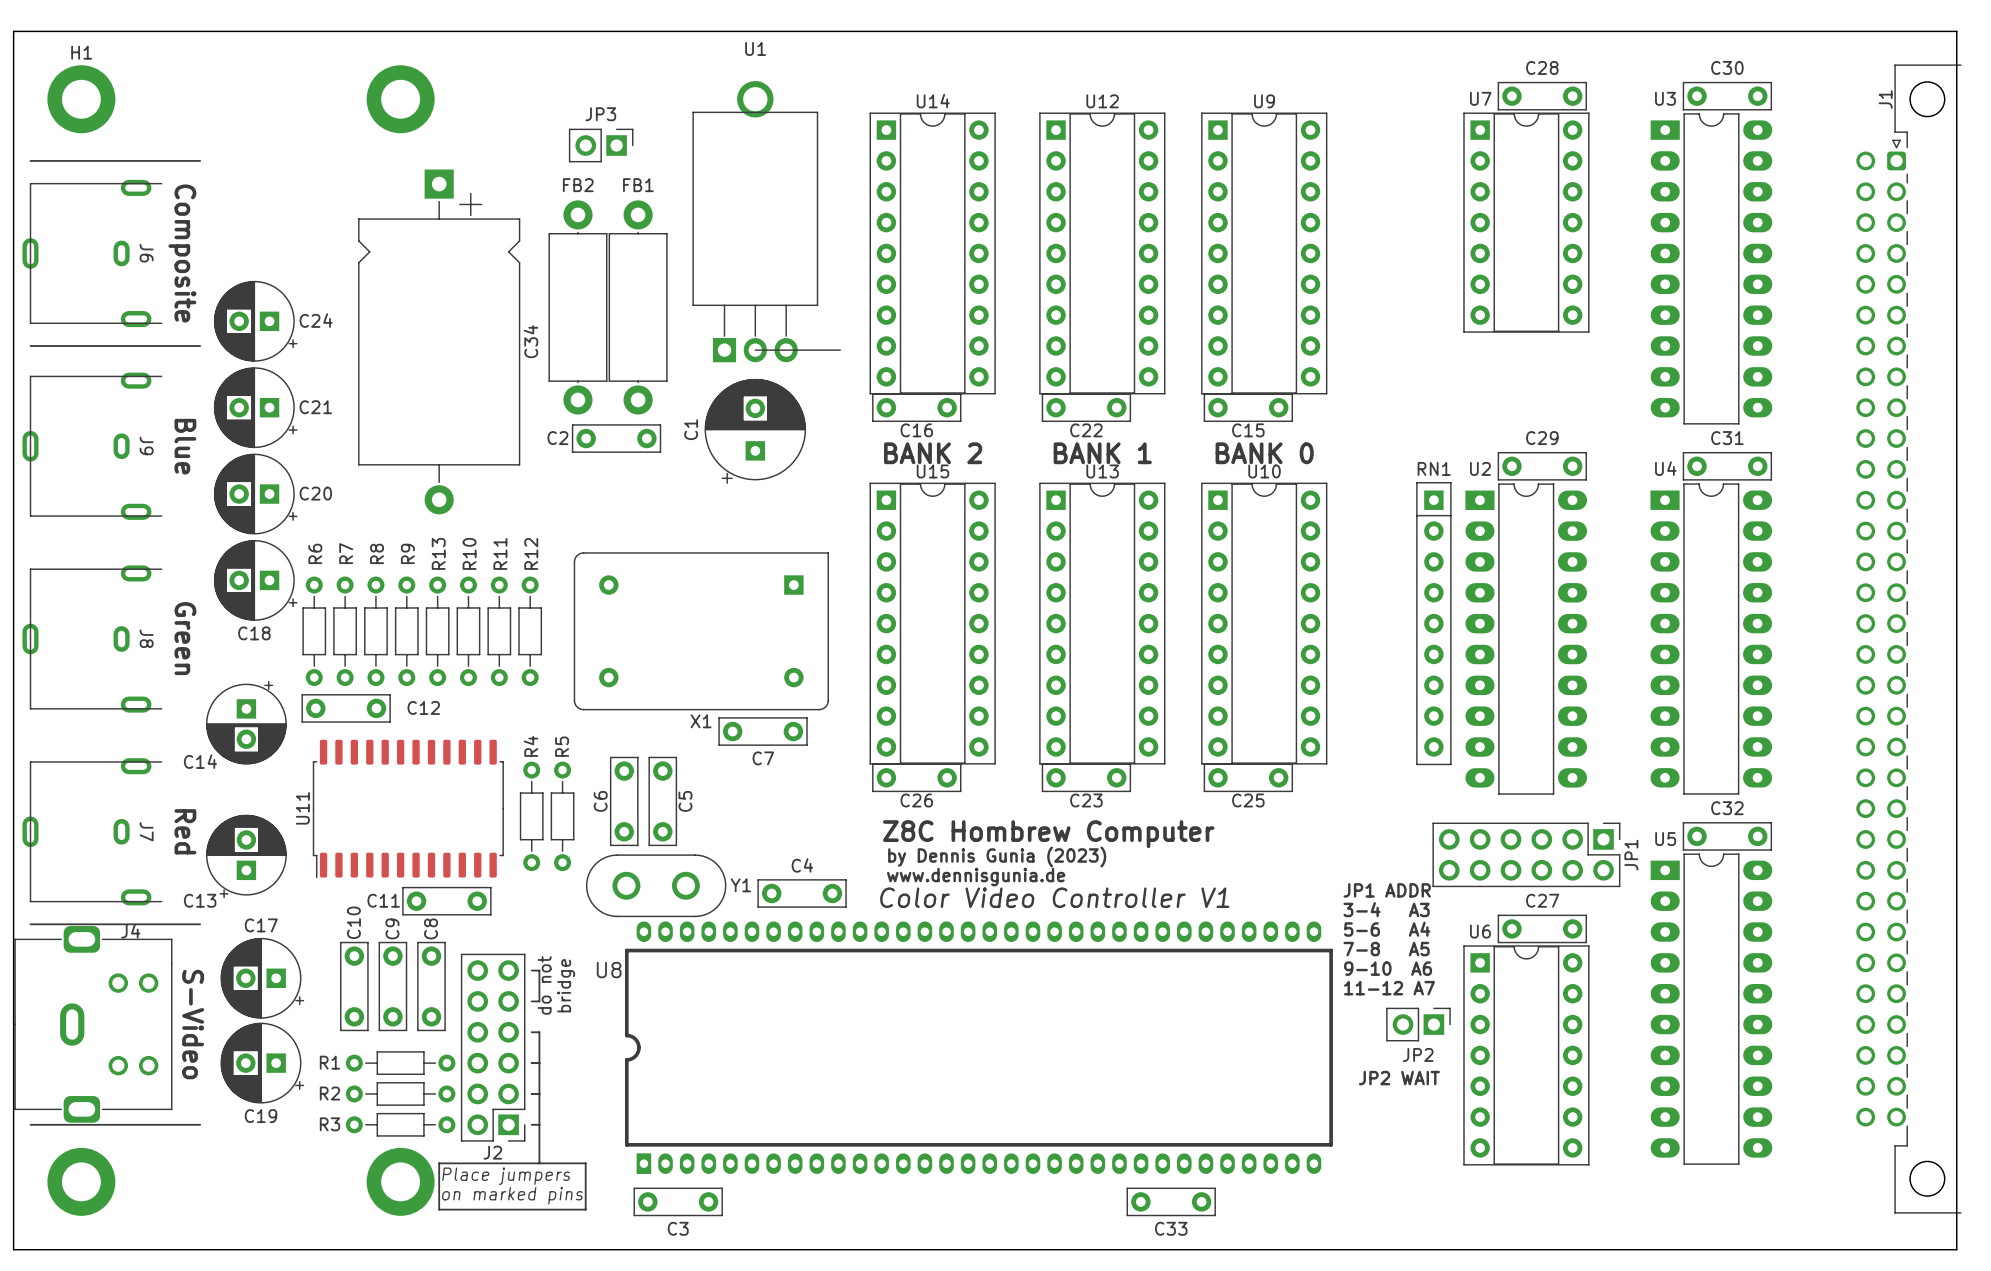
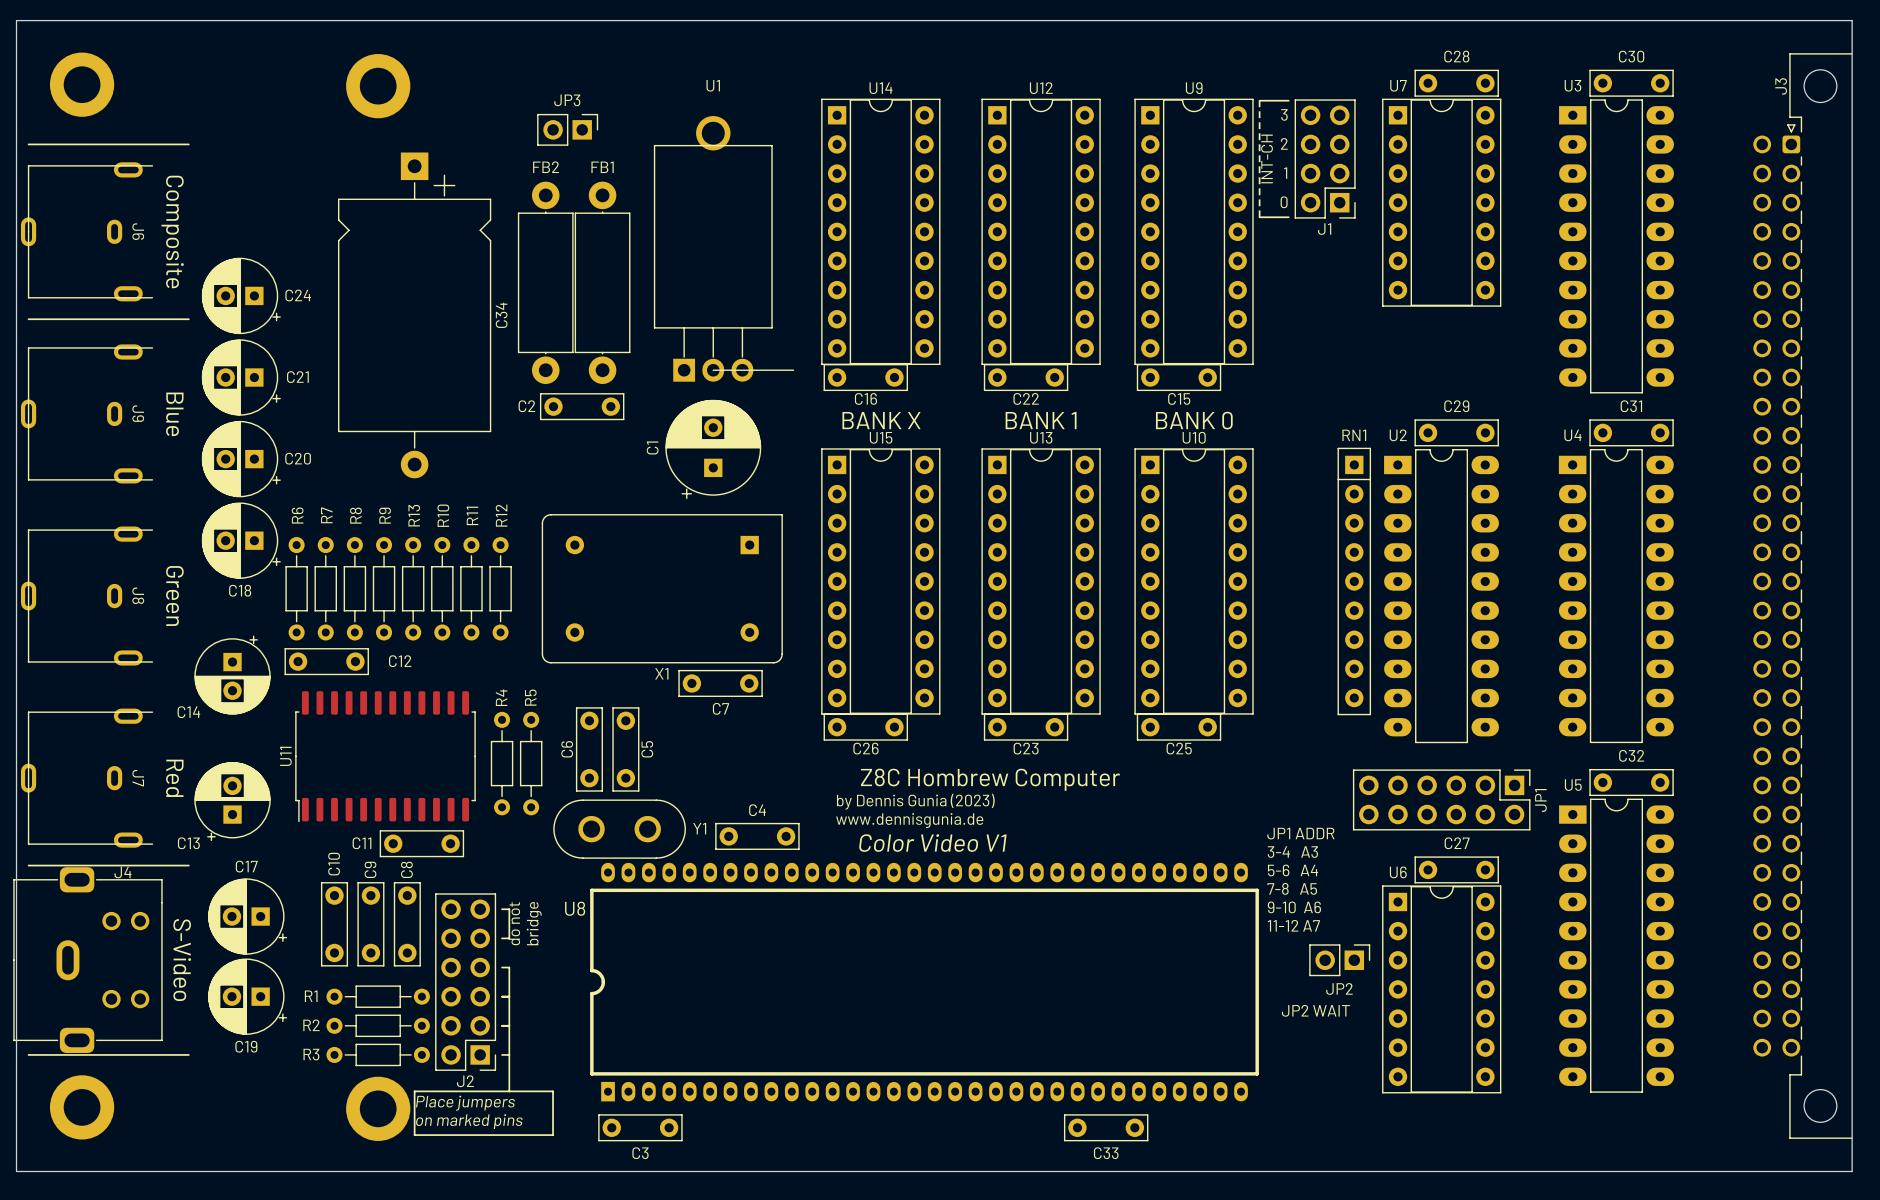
board edge: (13, 31) (1956, 31) (1956, 1249) (13, 1249) (13, 31) -> none
J1 footprint: [1856, 64, 1962, 1214] -> [1294, 99, 1356, 219]
H1: (81, 99) -> none
J1 name position: J1 (1885, 99) -> J1 (1324, 229)
line: none -> (1288, 100) (1259, 100) (1259, 217) (1288, 217)
text: none -> 3 (1284, 114)
text: none -> 2 (1284, 143)
text: none -> INT-CH (1267, 158)
text: none -> 1 (1285, 173)
U1 position: (766, 221) -> (724, 248)
text: none -> 0 (1284, 202)
C1 position: (755, 431) -> (713, 449)
text: BANK 2 (933, 453) -> BANK X (881, 420)
J3: none -> (934, 596)
text: Color Video Controller V1 (1054, 897) -> Color Video V1 (932, 843)
part: (81, 1181) -> none

